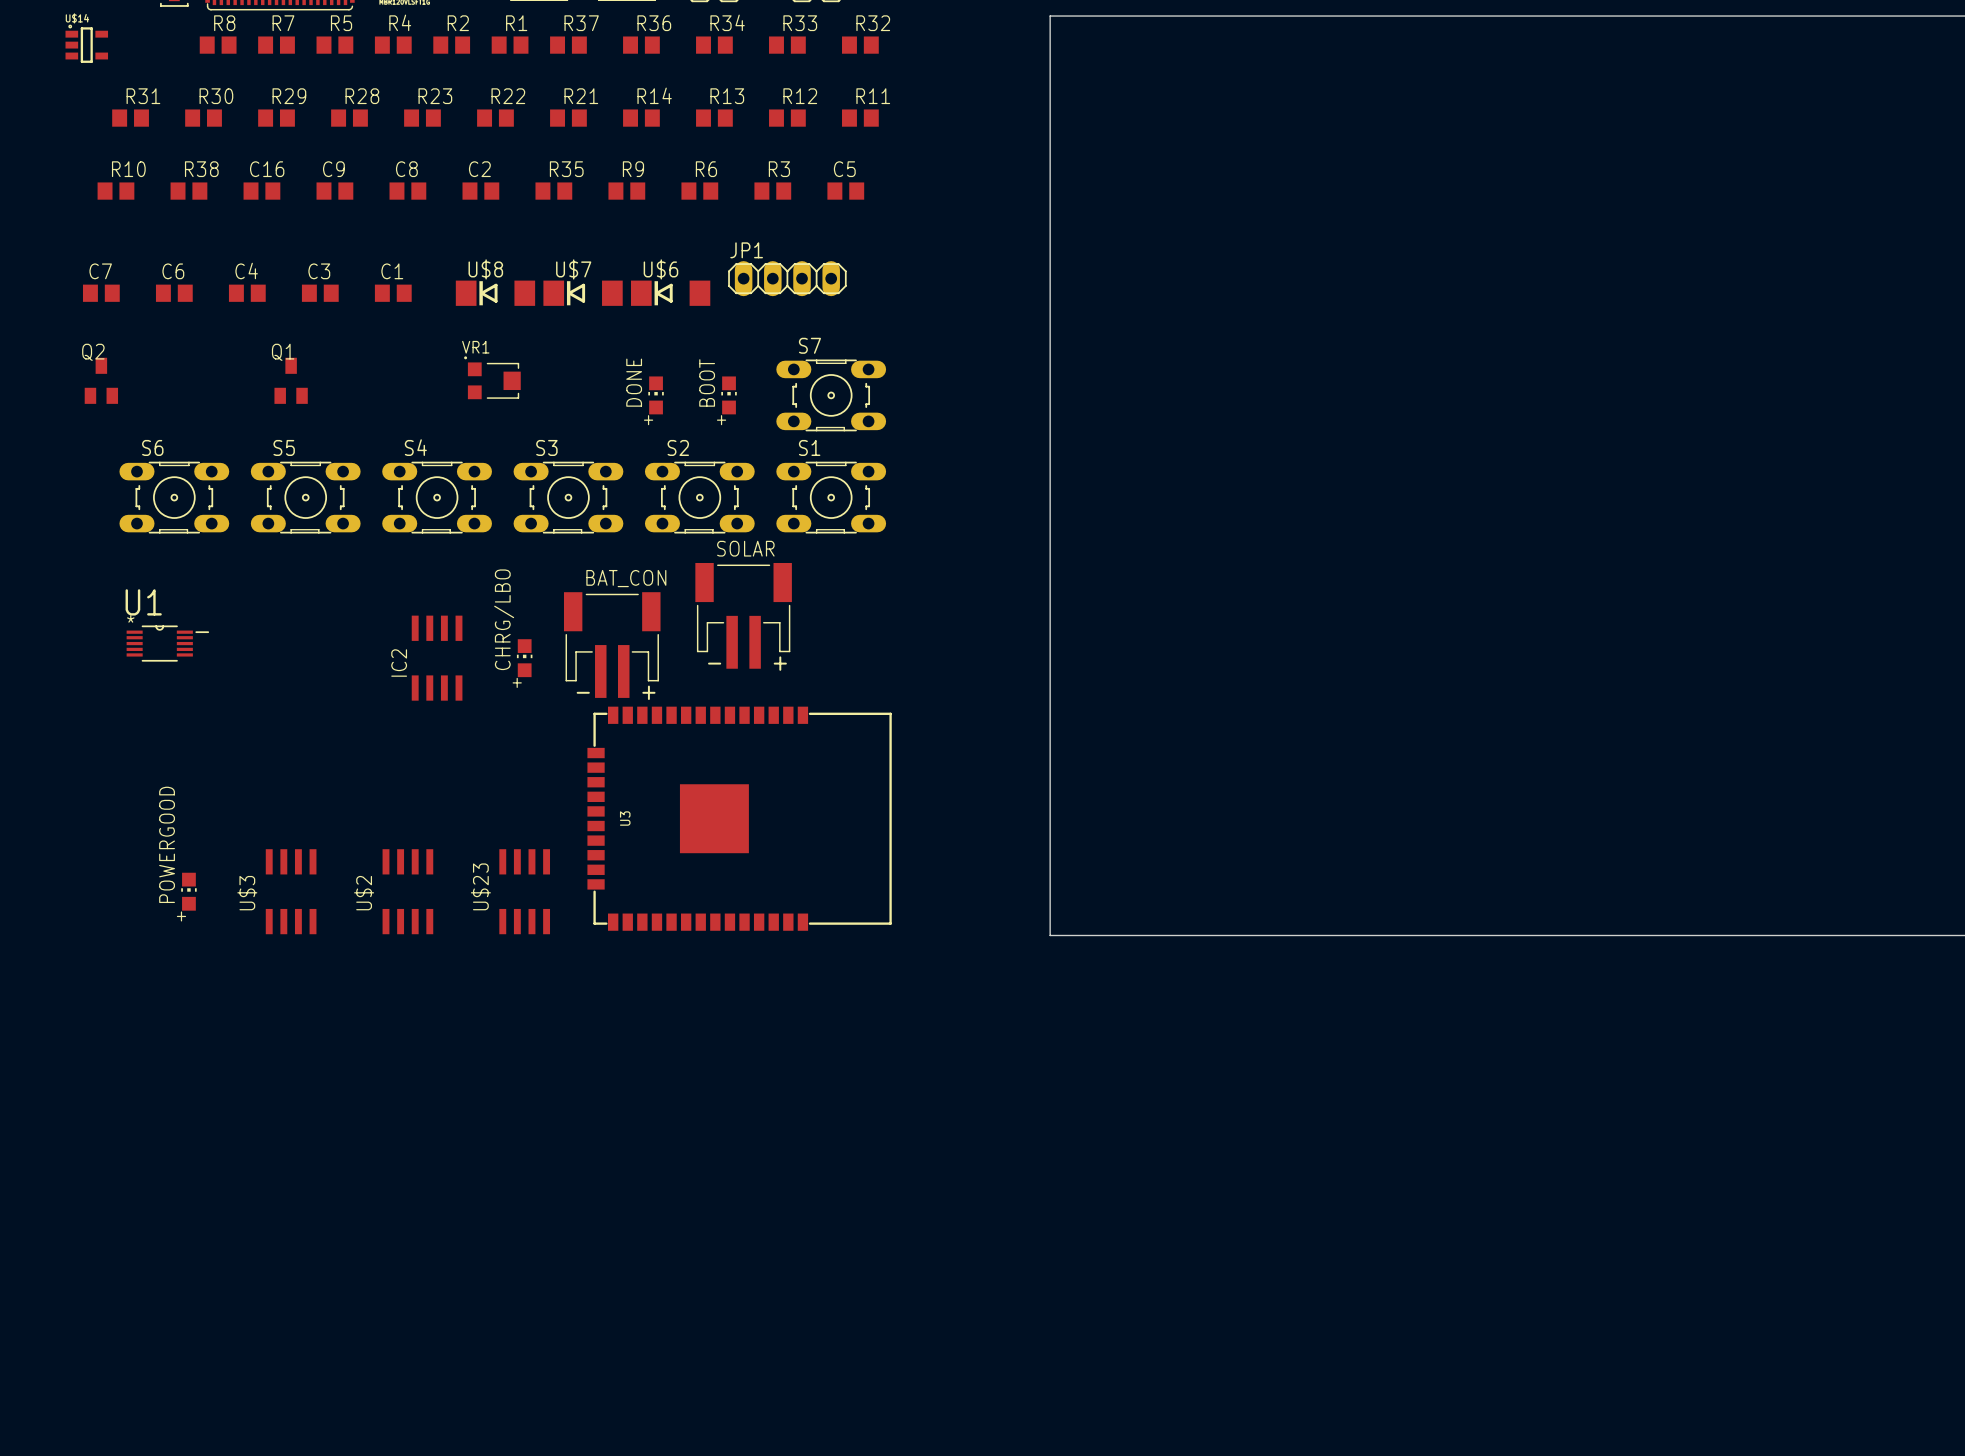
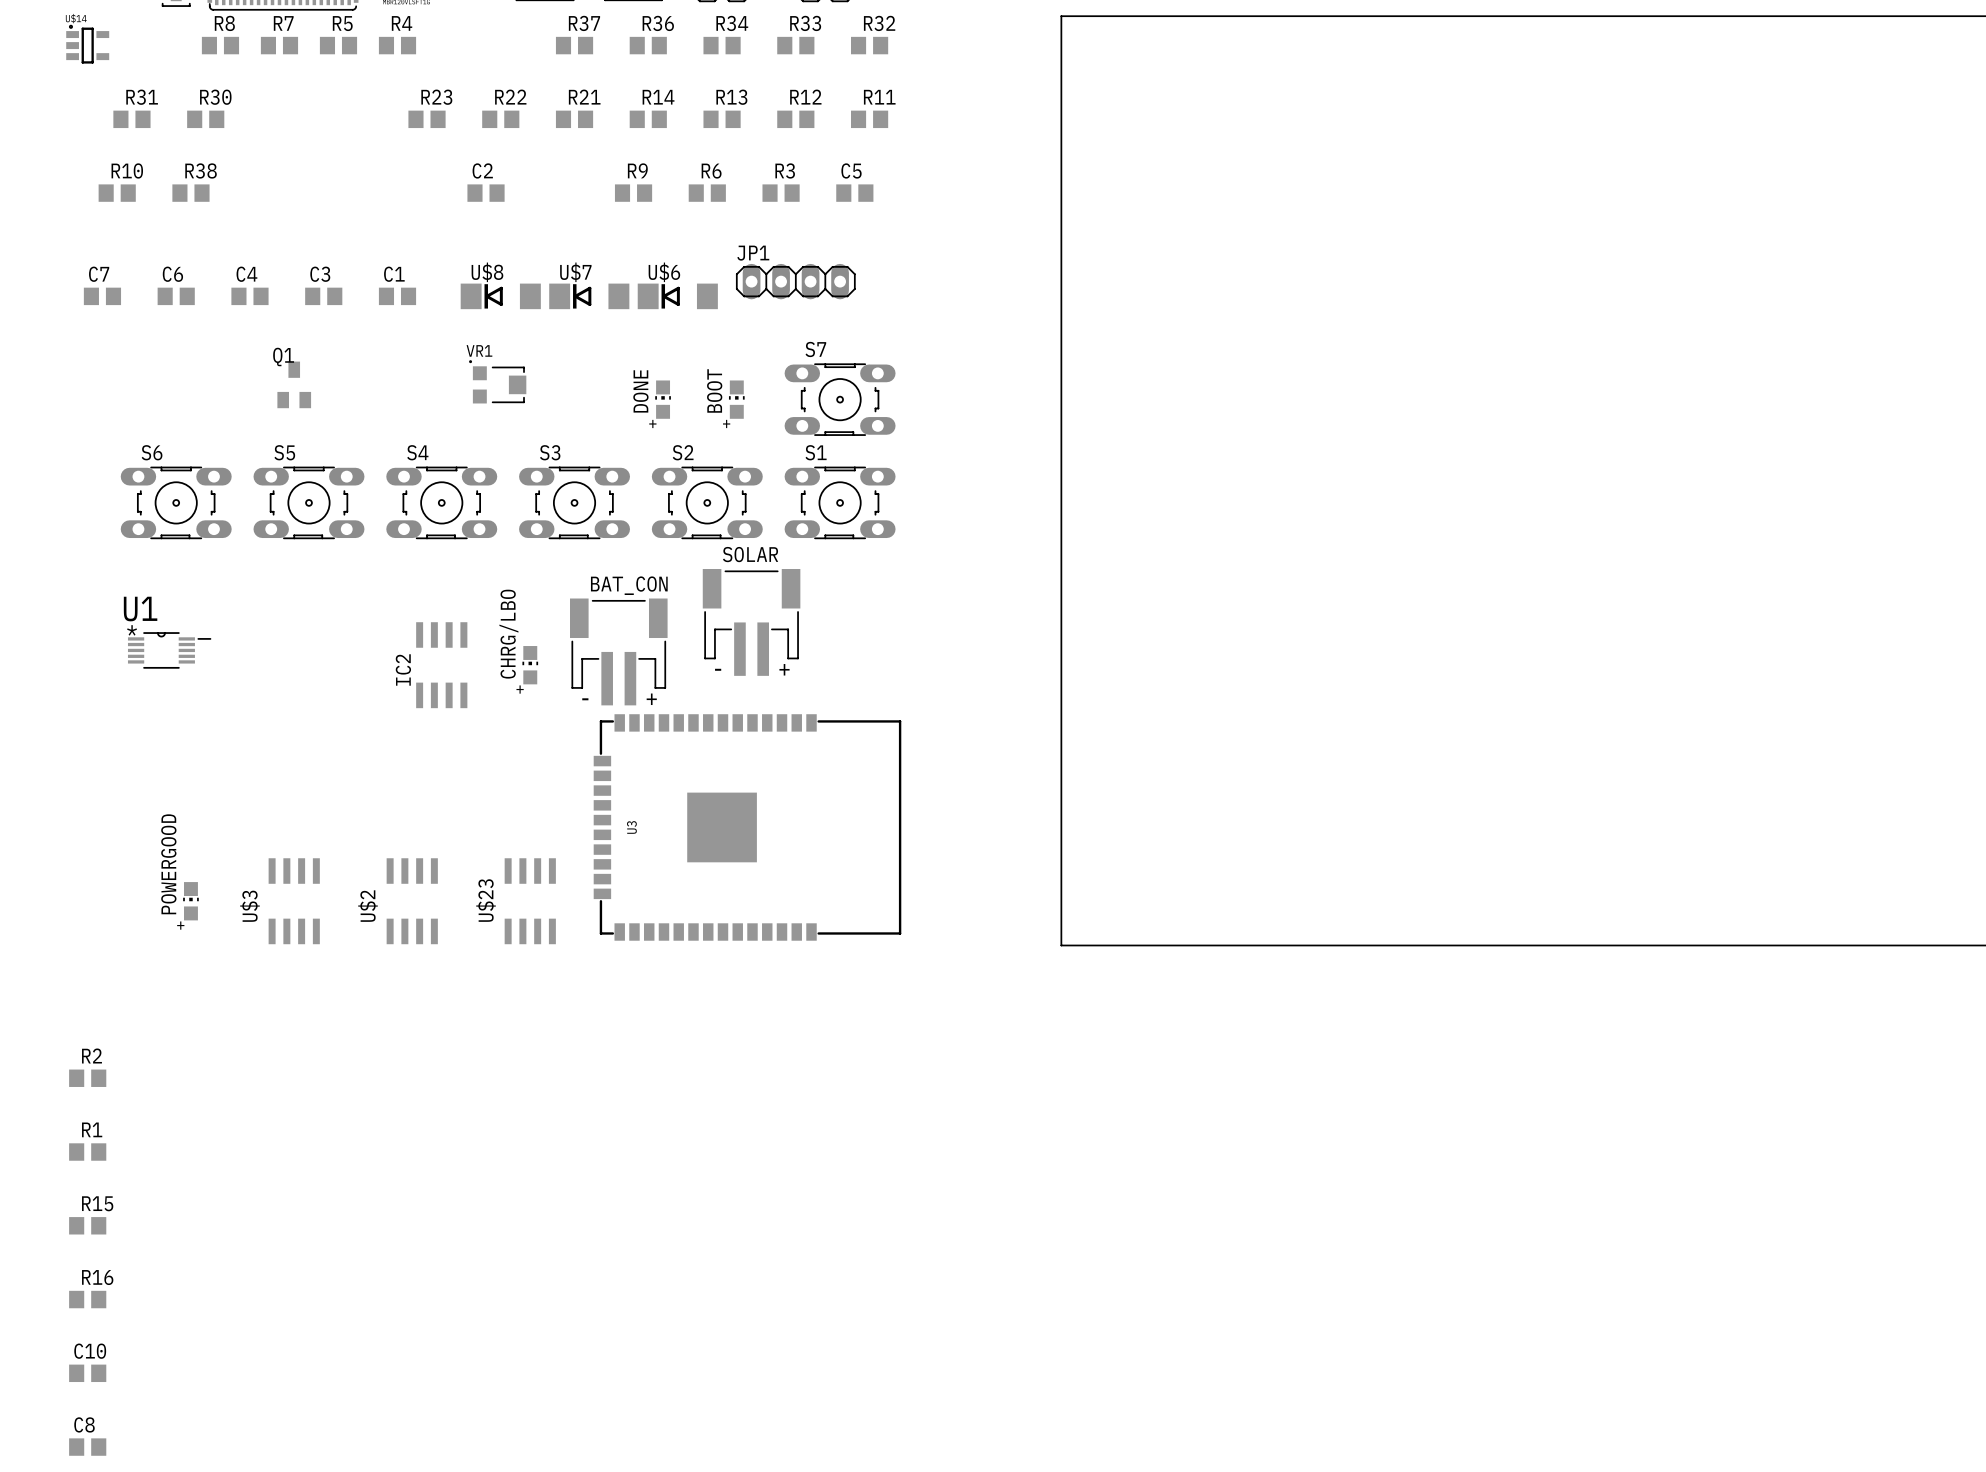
R2 position: (451, 45) -> (87, 1078)
R1 position: (510, 45) -> (87, 1152)
R29: (276, 118) -> none
R28: (349, 118) -> none
C16: (261, 191) -> none
C9: (334, 191) -> none
C8 position: (407, 191) -> (87, 1447)
R35: (553, 191) -> none
Q2: (101, 380) -> none
R15: none -> (87, 1225)
R16: none -> (87, 1299)
C10: none -> (87, 1373)

